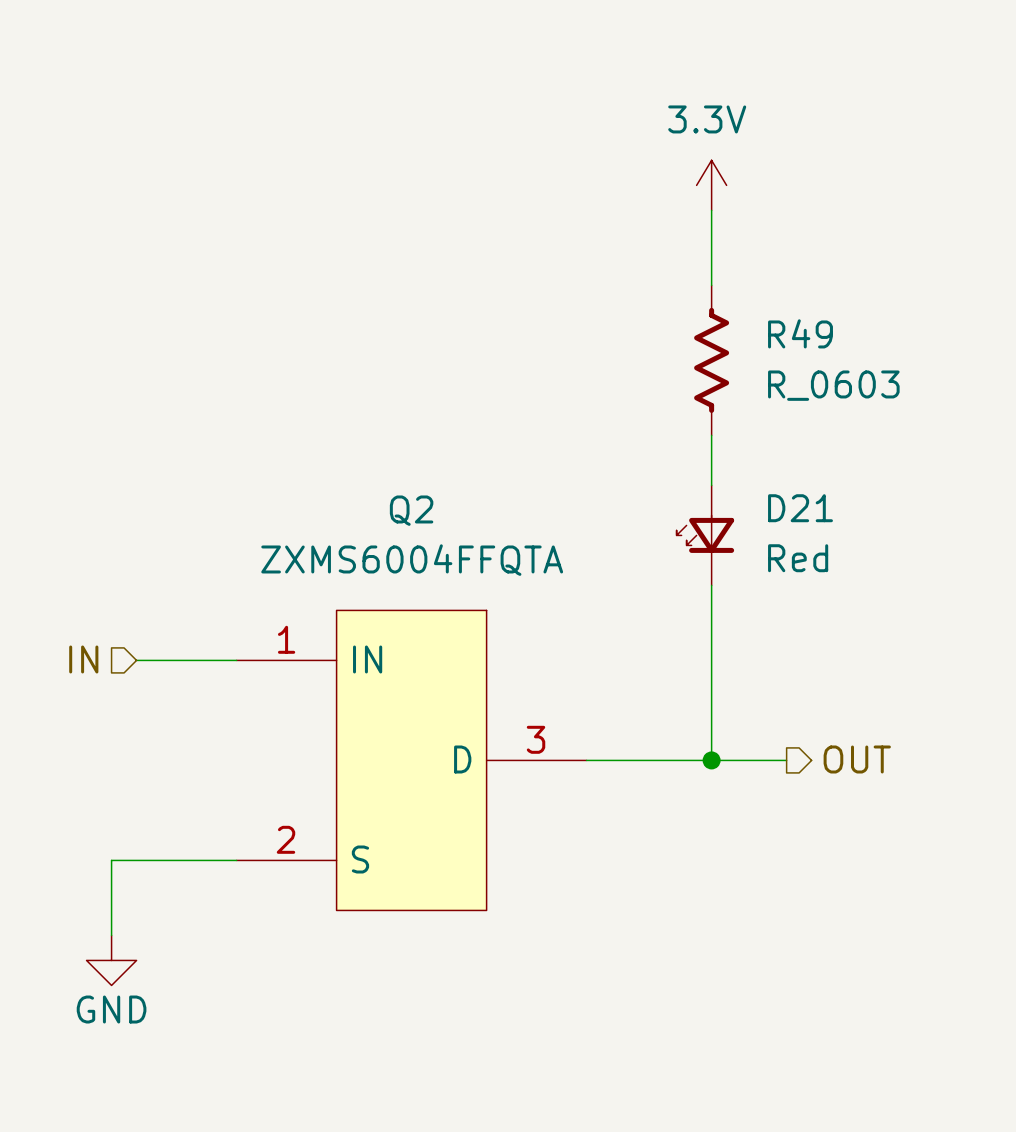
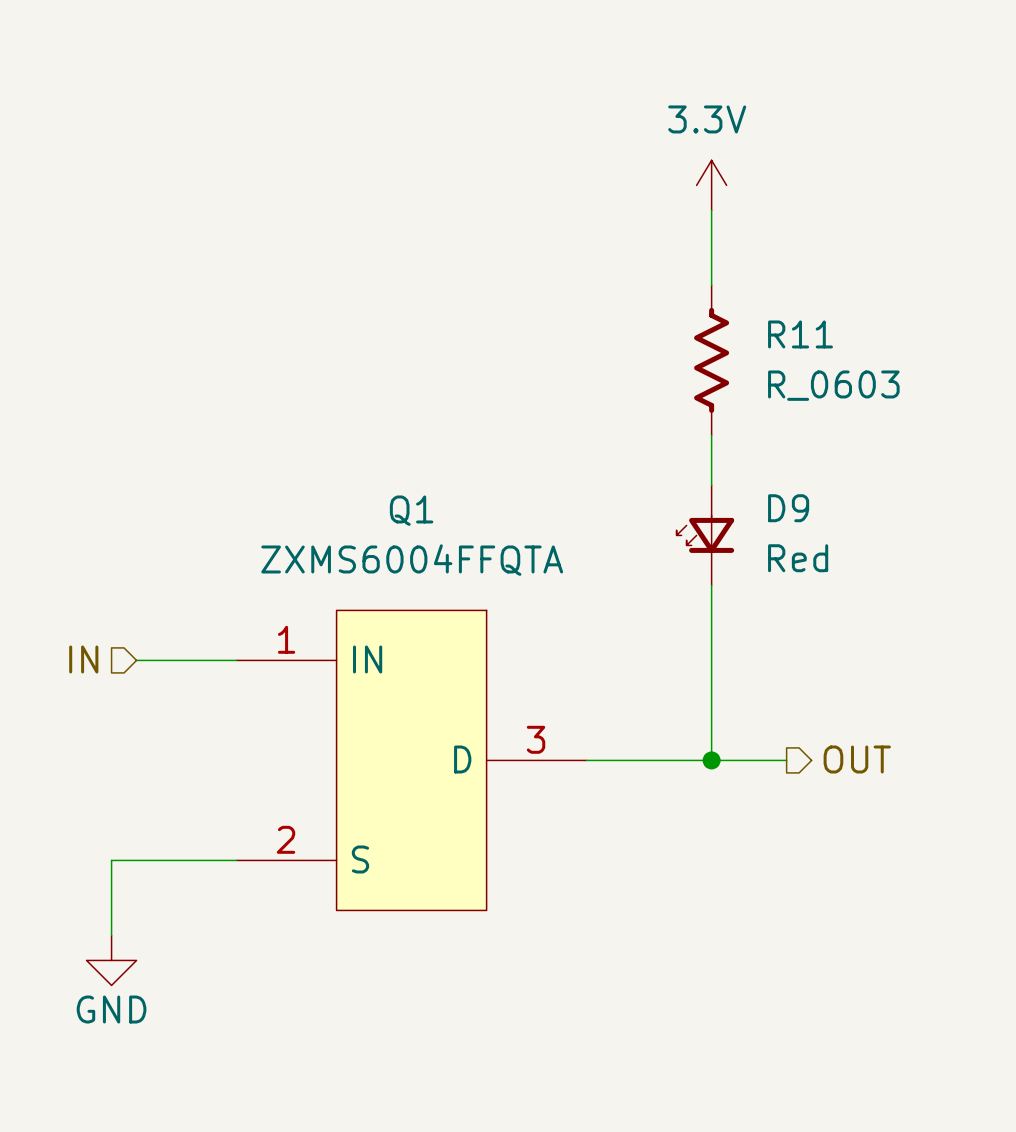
R49 name: R49 (800, 333) -> R11 (800, 334)
D21 name: D21 (800, 508) -> D9 (788, 508)
Q2 name: Q2 (411, 510) -> Q1 (411, 510)

